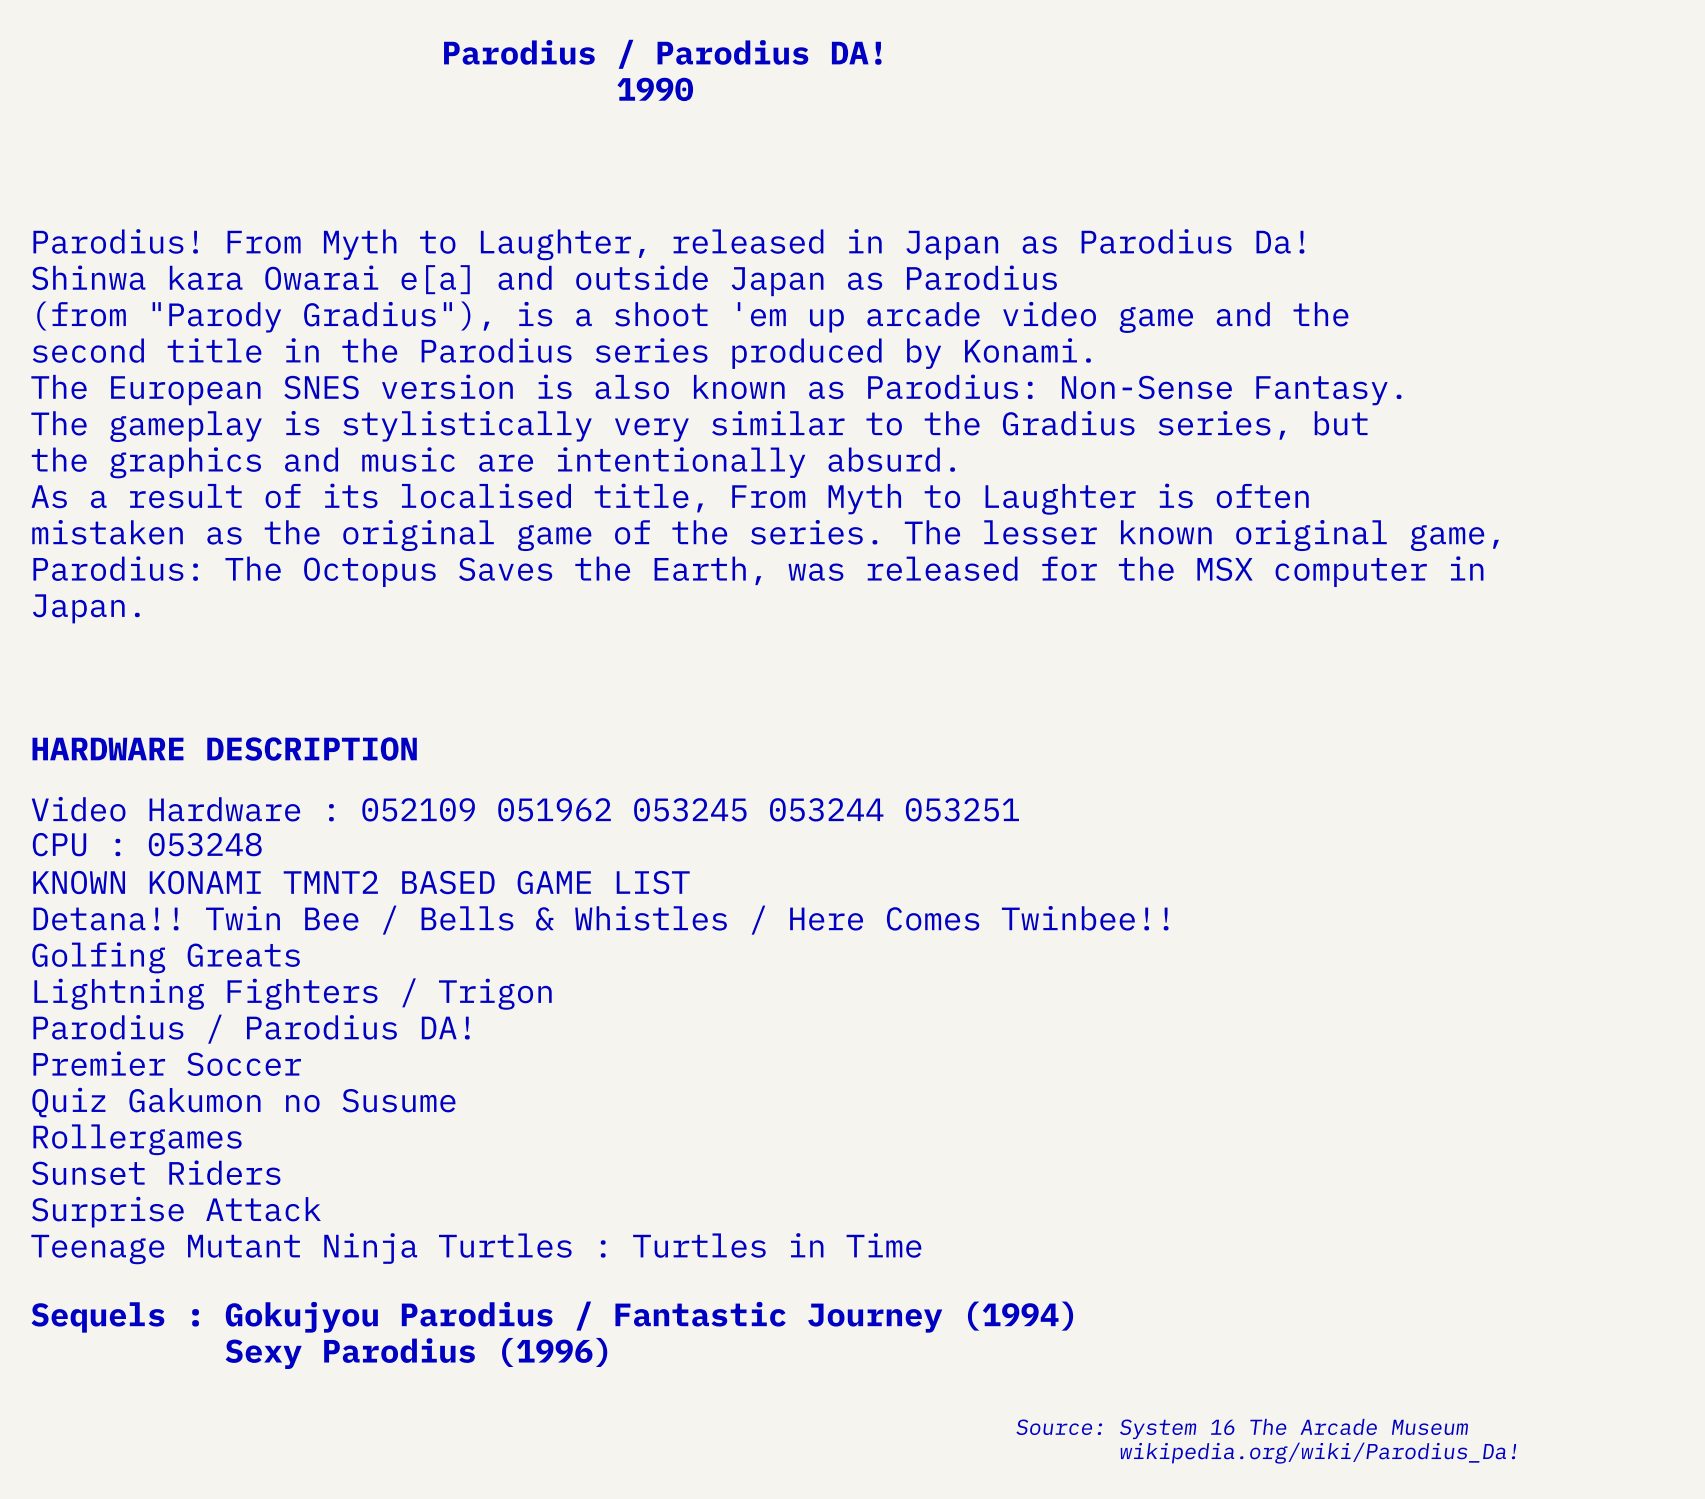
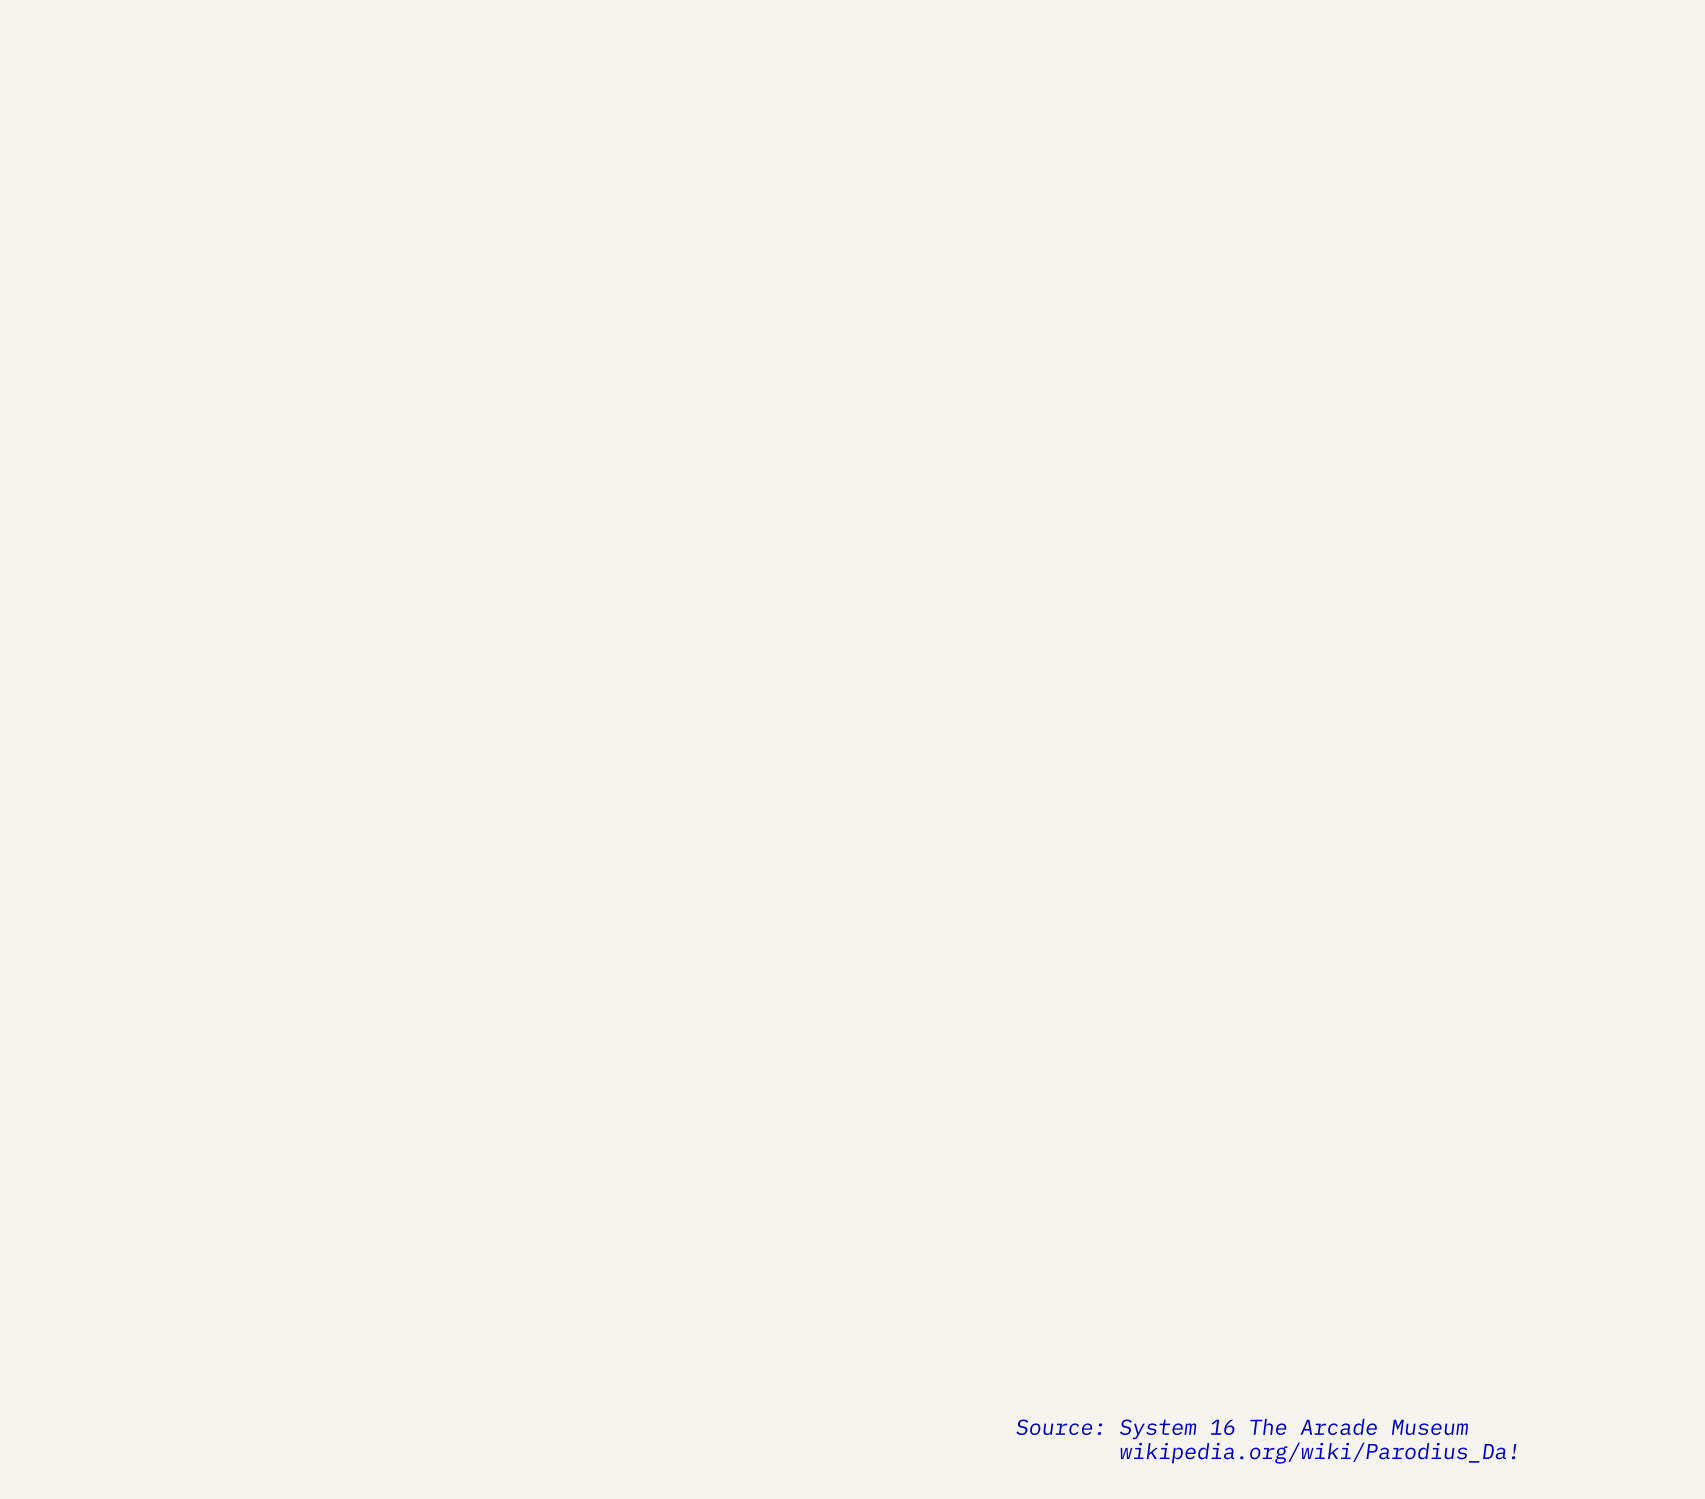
text: Parodius / Parodius DA! (662, 54) -> none
text: 1990 (655, 89) -> none
text: Parodius! From Myth to Laughter, released in Japan as Parodius Da! (668, 244) -> none
text: Shinwa kara Owarai e[a] and outside Japan as Parodius (544, 280) -> none
text: (from "Parody Gradius"), is a shoot 'em up arcade video game and the (692, 317) -> none
text: second title in the Parodius series produced by Konami. (561, 353) -> none
text: The European SNES version is also known as Parodius: Non-Sense Fantasy. (716, 389) -> none
text: The gameplay is stylistically very similar to the Gradius series, but (699, 426) -> none
text: the graphics and music are intentionally absurd. (493, 462) -> none
text: As a result of its localised title, From Myth to Laughter is often (670, 499) -> none
text: mistaken as the original game of the series. The lesser known original game, (765, 535) -> none
text: Parodius: The Octopus Saves the Earth, was released for the MSX computer in (758, 571) -> none
text: Japan. (86, 608) -> none
text: HARDWARE DESCRIPTION (224, 749) -> none
text: Video Hardware : 052109 051962 053245 053244 053251 (525, 809) -> none
text: CPU : 053248 (147, 844) -> none
text: KNOWN KONAMI TMNT2 BASED GAME LIST (361, 882) -> none
text: Detana!! Twin Bee / Bells & Whistles / Here Comes Twinbee!! (601, 920) -> none
text: Golfing Greats (166, 957) -> none
text: Lightning Fighters / Trigon (293, 994) -> none
text: Parodius / Parodius DA! (251, 1029) -> none
text: Premier Soccer (167, 1063) -> none
text: Quiz Gakumon no Susume (243, 1102) -> none
text: Rollergames (137, 1139) -> none
text: Sunset Riders (156, 1172) -> none
text: Surprise Attack (176, 1212) -> none
text: Teenage Mutant Ninja Turtles : Turtles in Time (476, 1248) -> none
text: Sequels : Gokujyou Parodius / Fantastic Journey (1994) (552, 1317) -> none
text: Sexy Parodius (1996) (416, 1353) -> none

